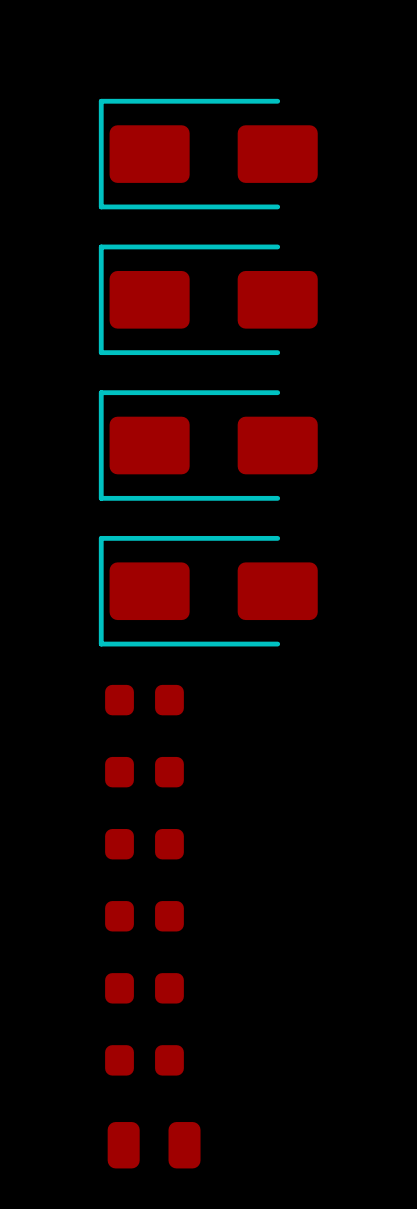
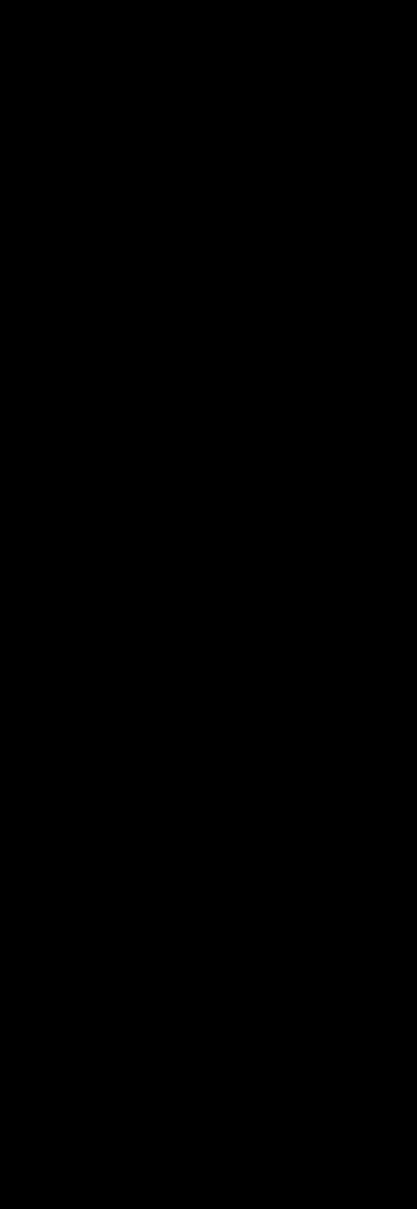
part: (208, 154) -> none
part: (208, 299) -> none
part: (208, 445) -> none
part: (208, 591) -> none
part: (144, 700) -> none
part: (144, 772) -> none
part: (144, 844) -> none
part: (144, 916) -> none
part: (144, 988) -> none
part: (144, 1060) -> none
part: (154, 1145) -> none

